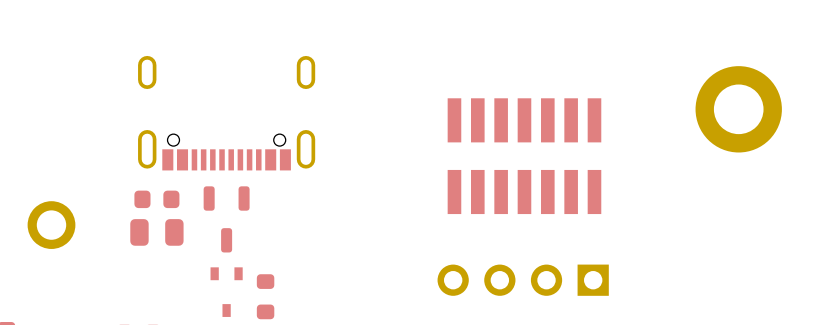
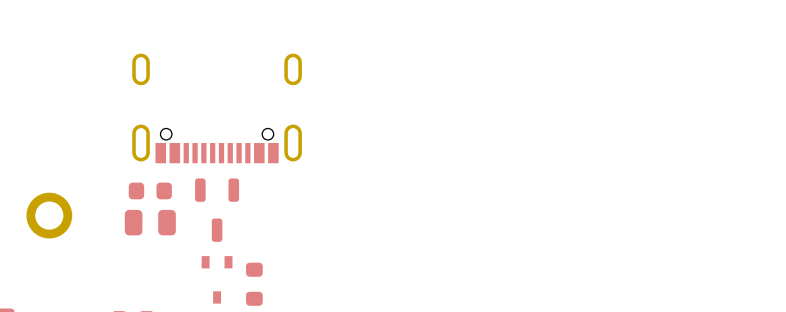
part: (738, 109) -> none
part: (524, 156) -> none
part: (523, 280) -> none

